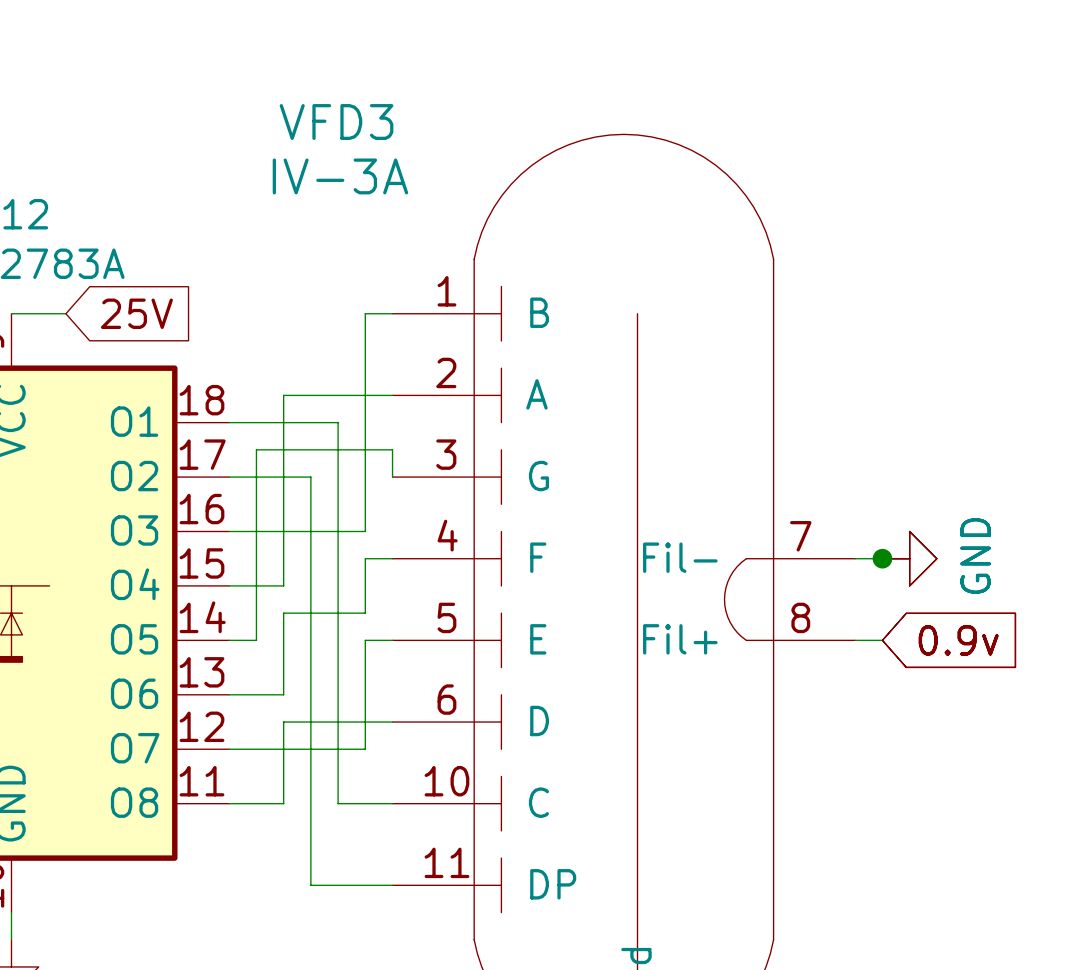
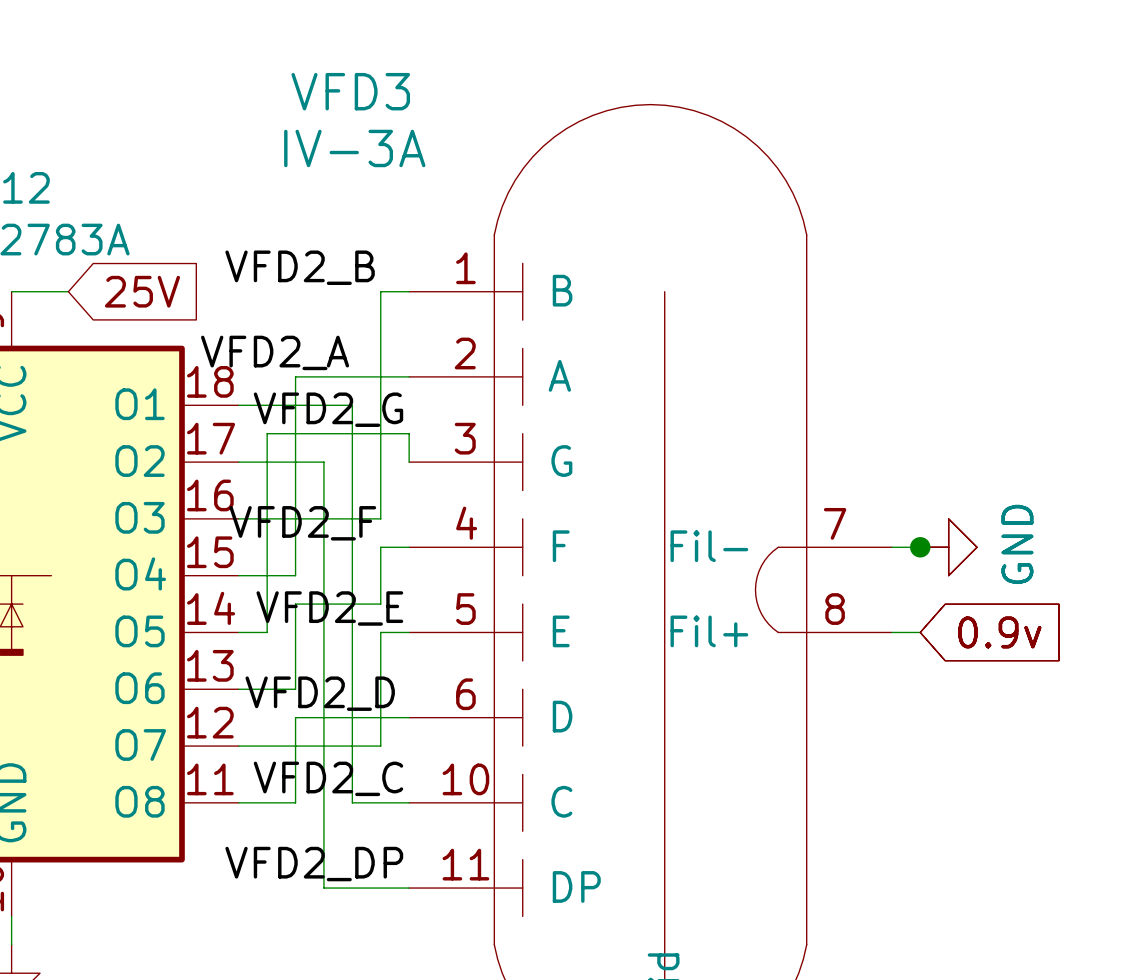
label: none -> VFD2_B (300, 267)
label: none -> VFD2_A (275, 352)
label: none -> VFD2_G (328, 409)
label: none -> VFD2_F (302, 523)
label: none -> VFD2_E (329, 608)
label: none -> VFD2_D (320, 693)
label: none -> VFD2_C (328, 778)
label: none -> VFD2_DP (314, 864)

